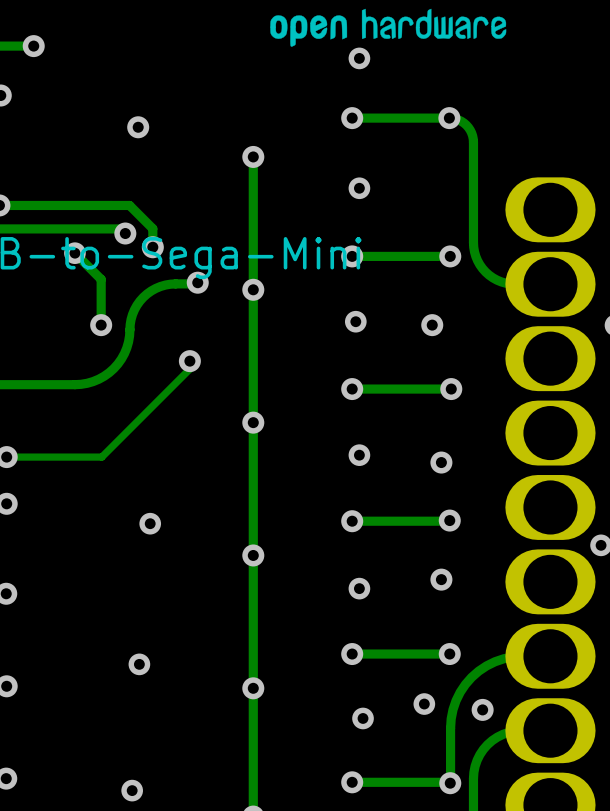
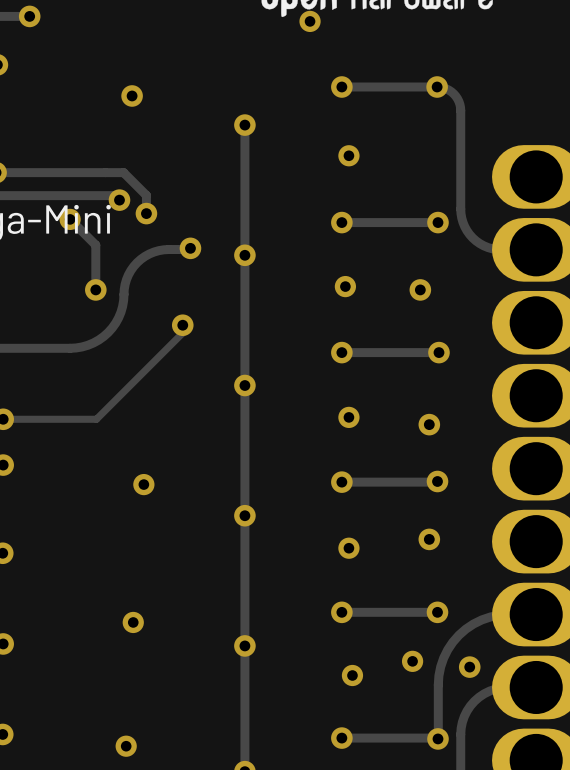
via position: (359, 58) -> (310, 21)

